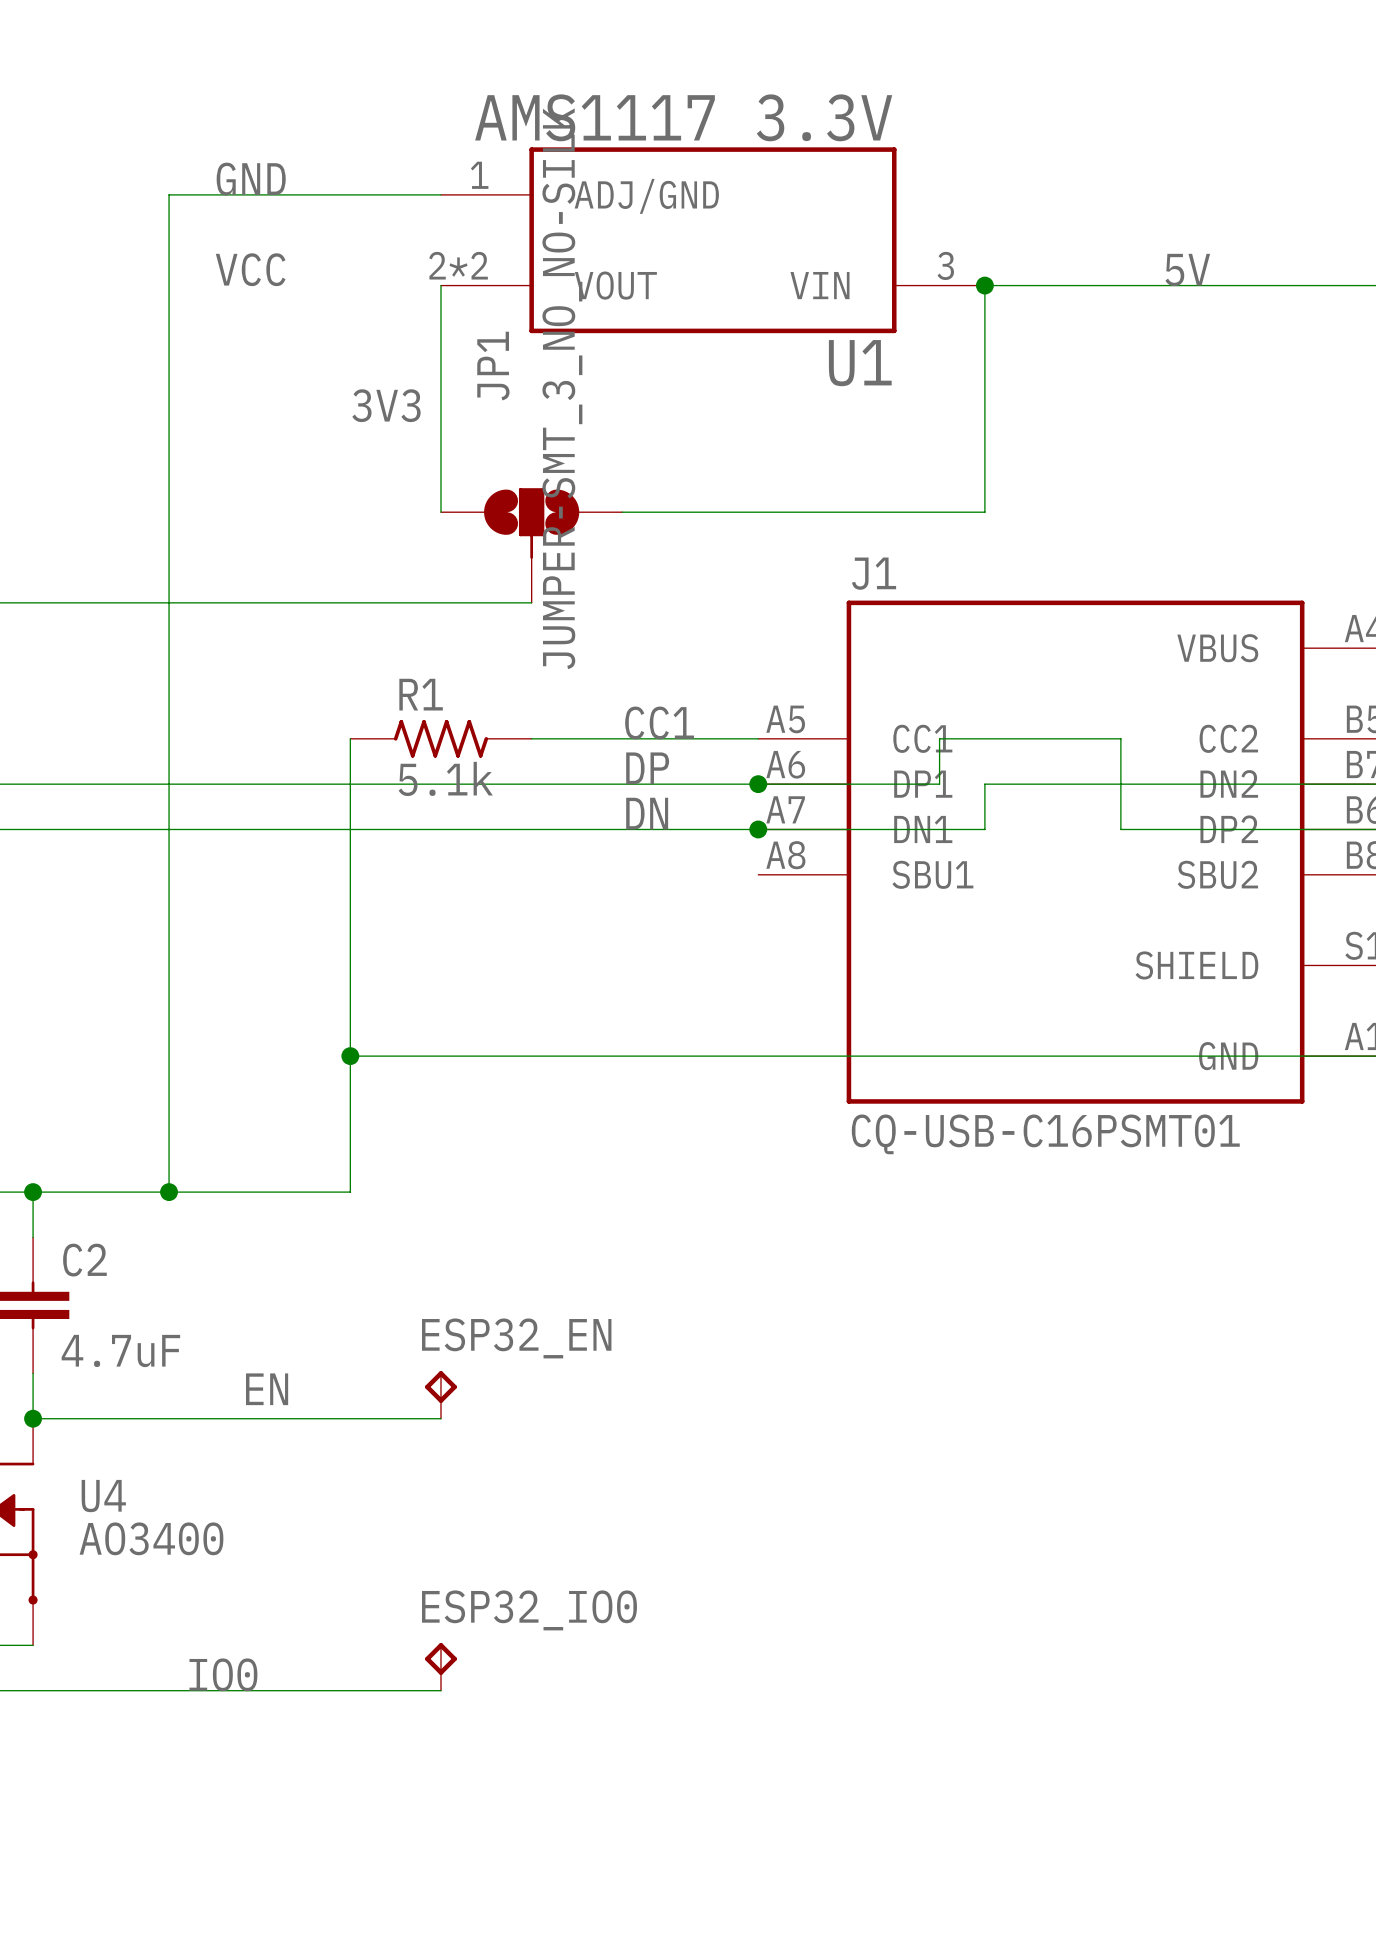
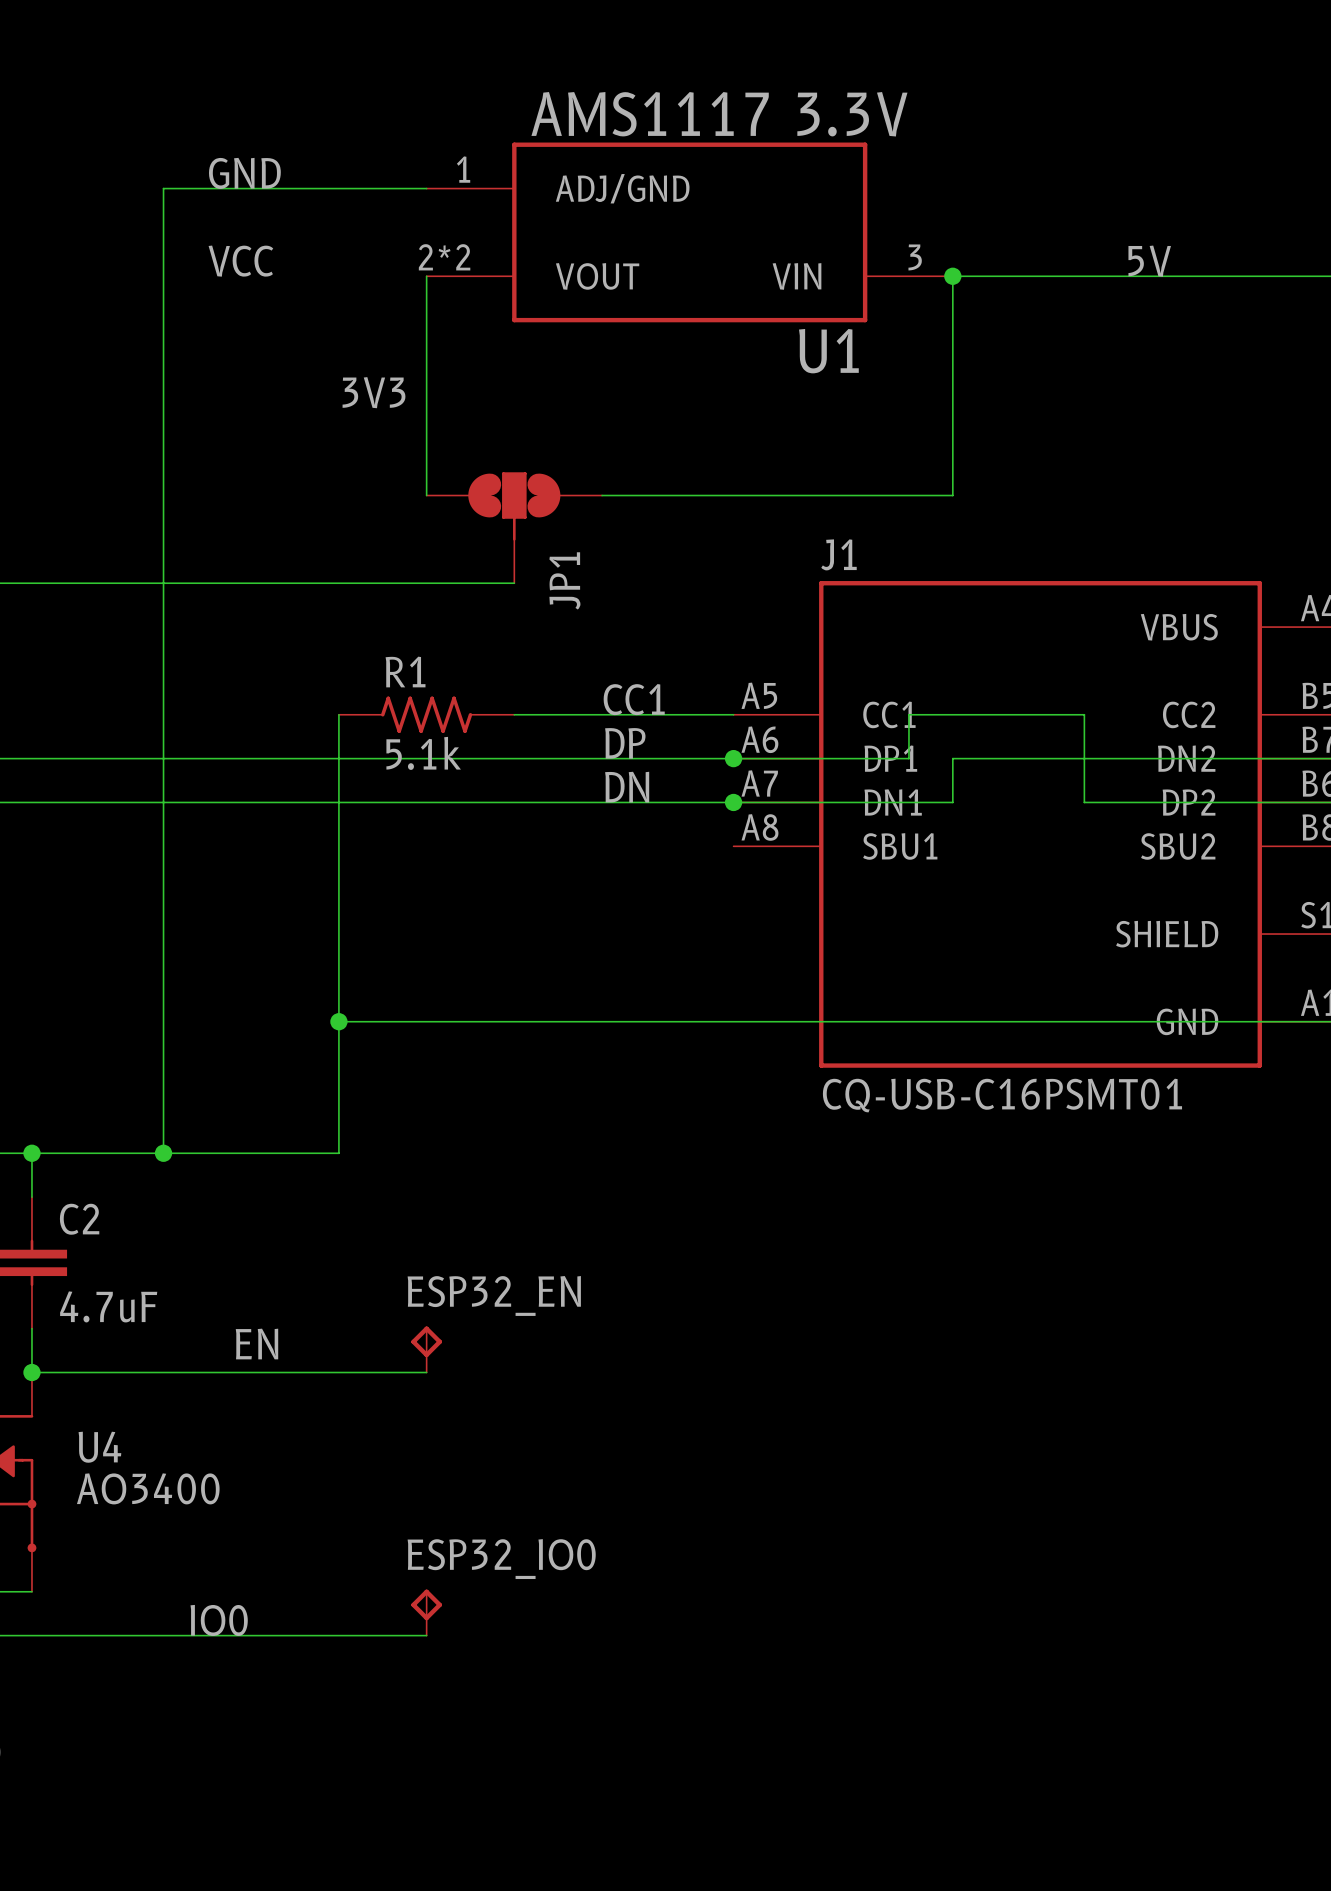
U1 value position: AMS1117 3.3V (683, 117) -> AMS1117 3.3V (719, 114)
JP1 name position: JP1 (493, 366) -> JP1 (564, 580)
JP1 value: JUMPER-SMT_3_NO_NO-SILK (562, 388) -> none

